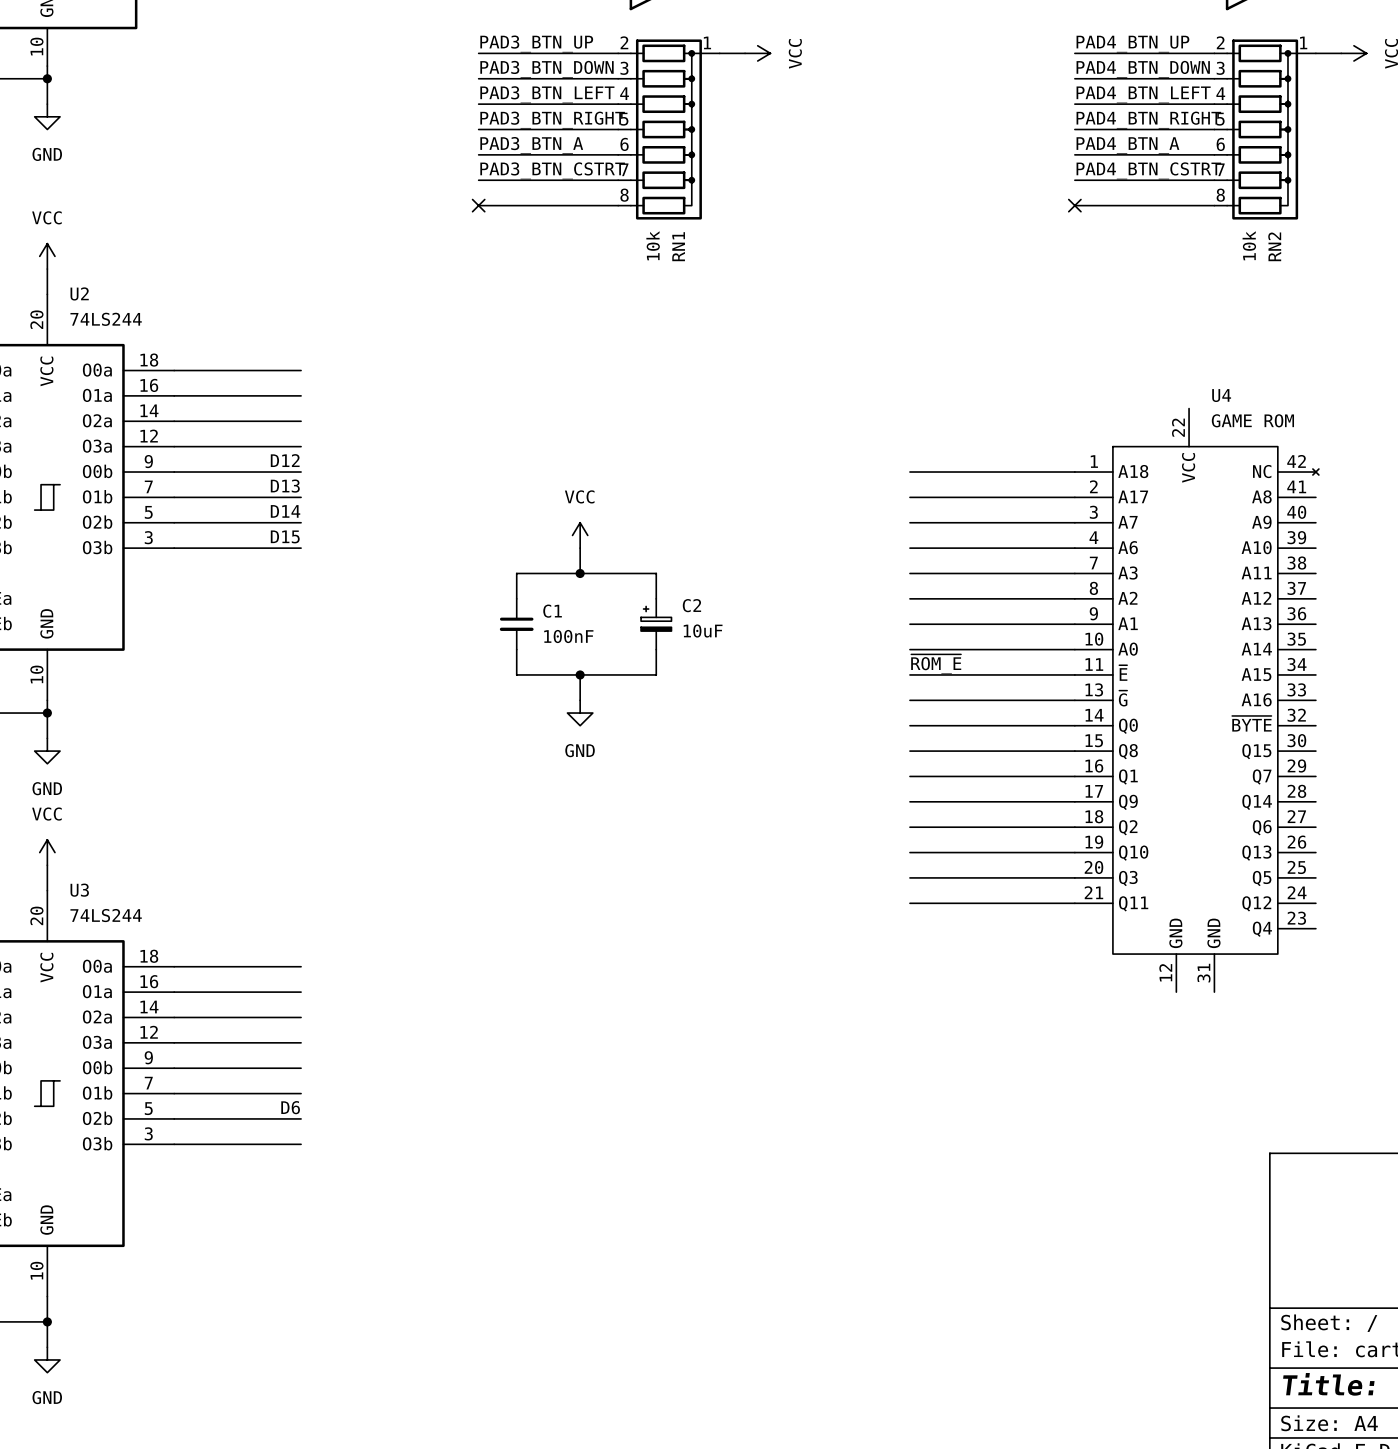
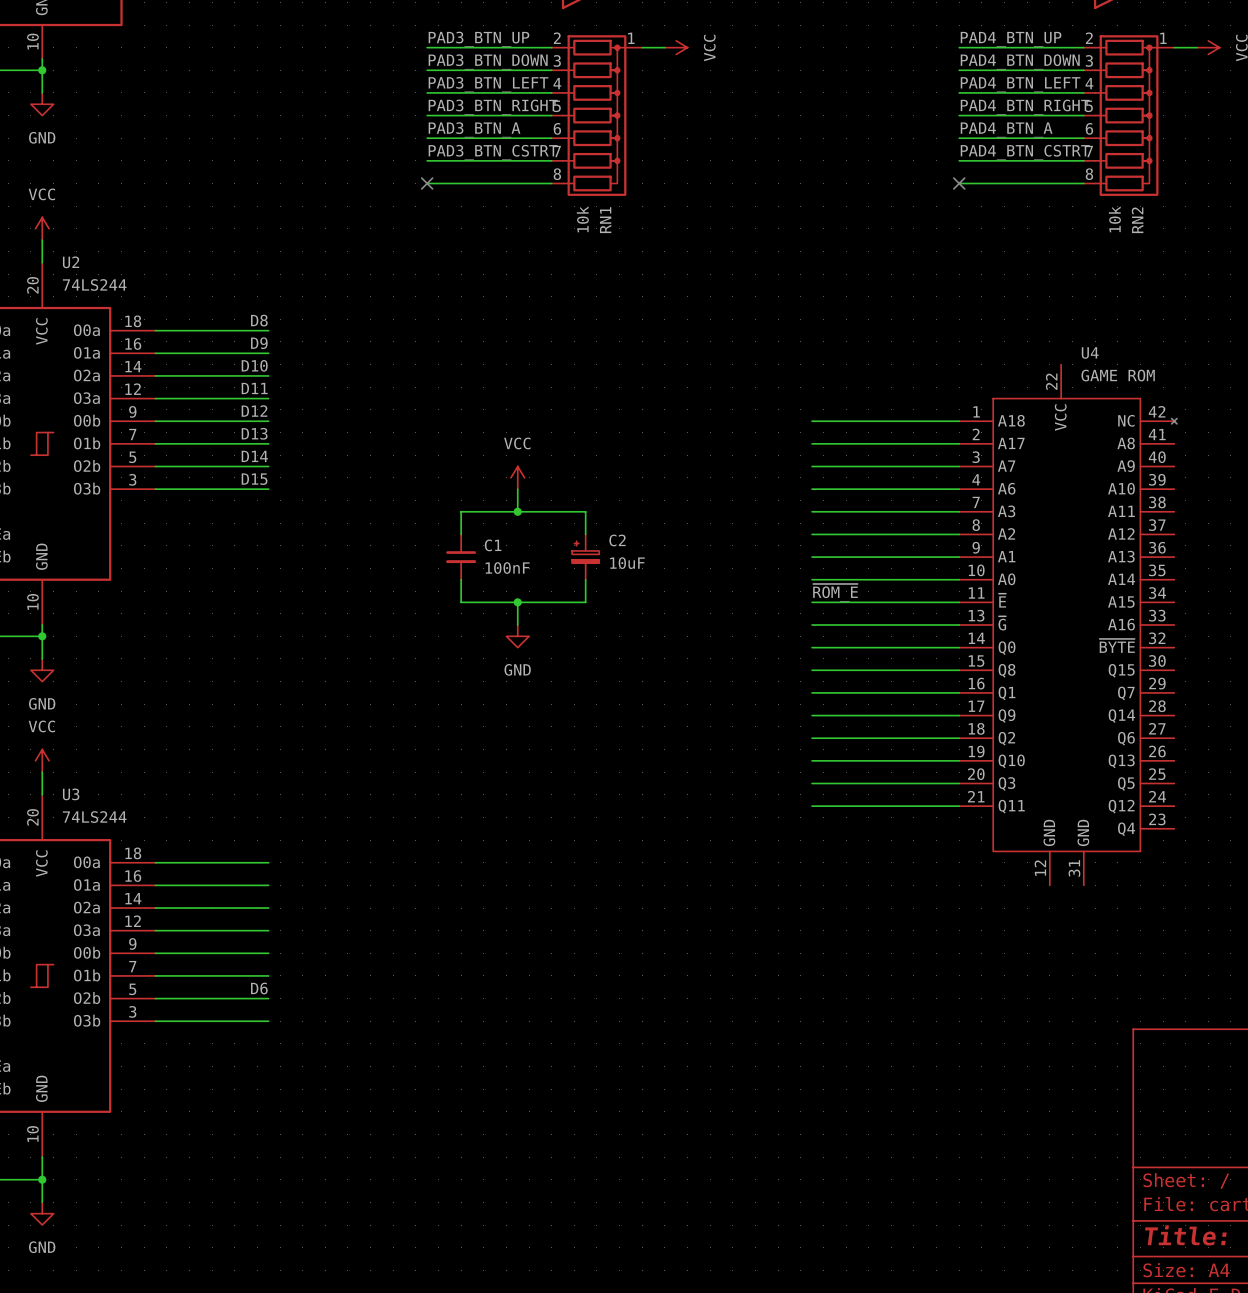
label: none -> D8 (259, 320)
label: none -> D9 (259, 343)
label: none -> D10 (254, 365)
label: none -> D11 (254, 388)

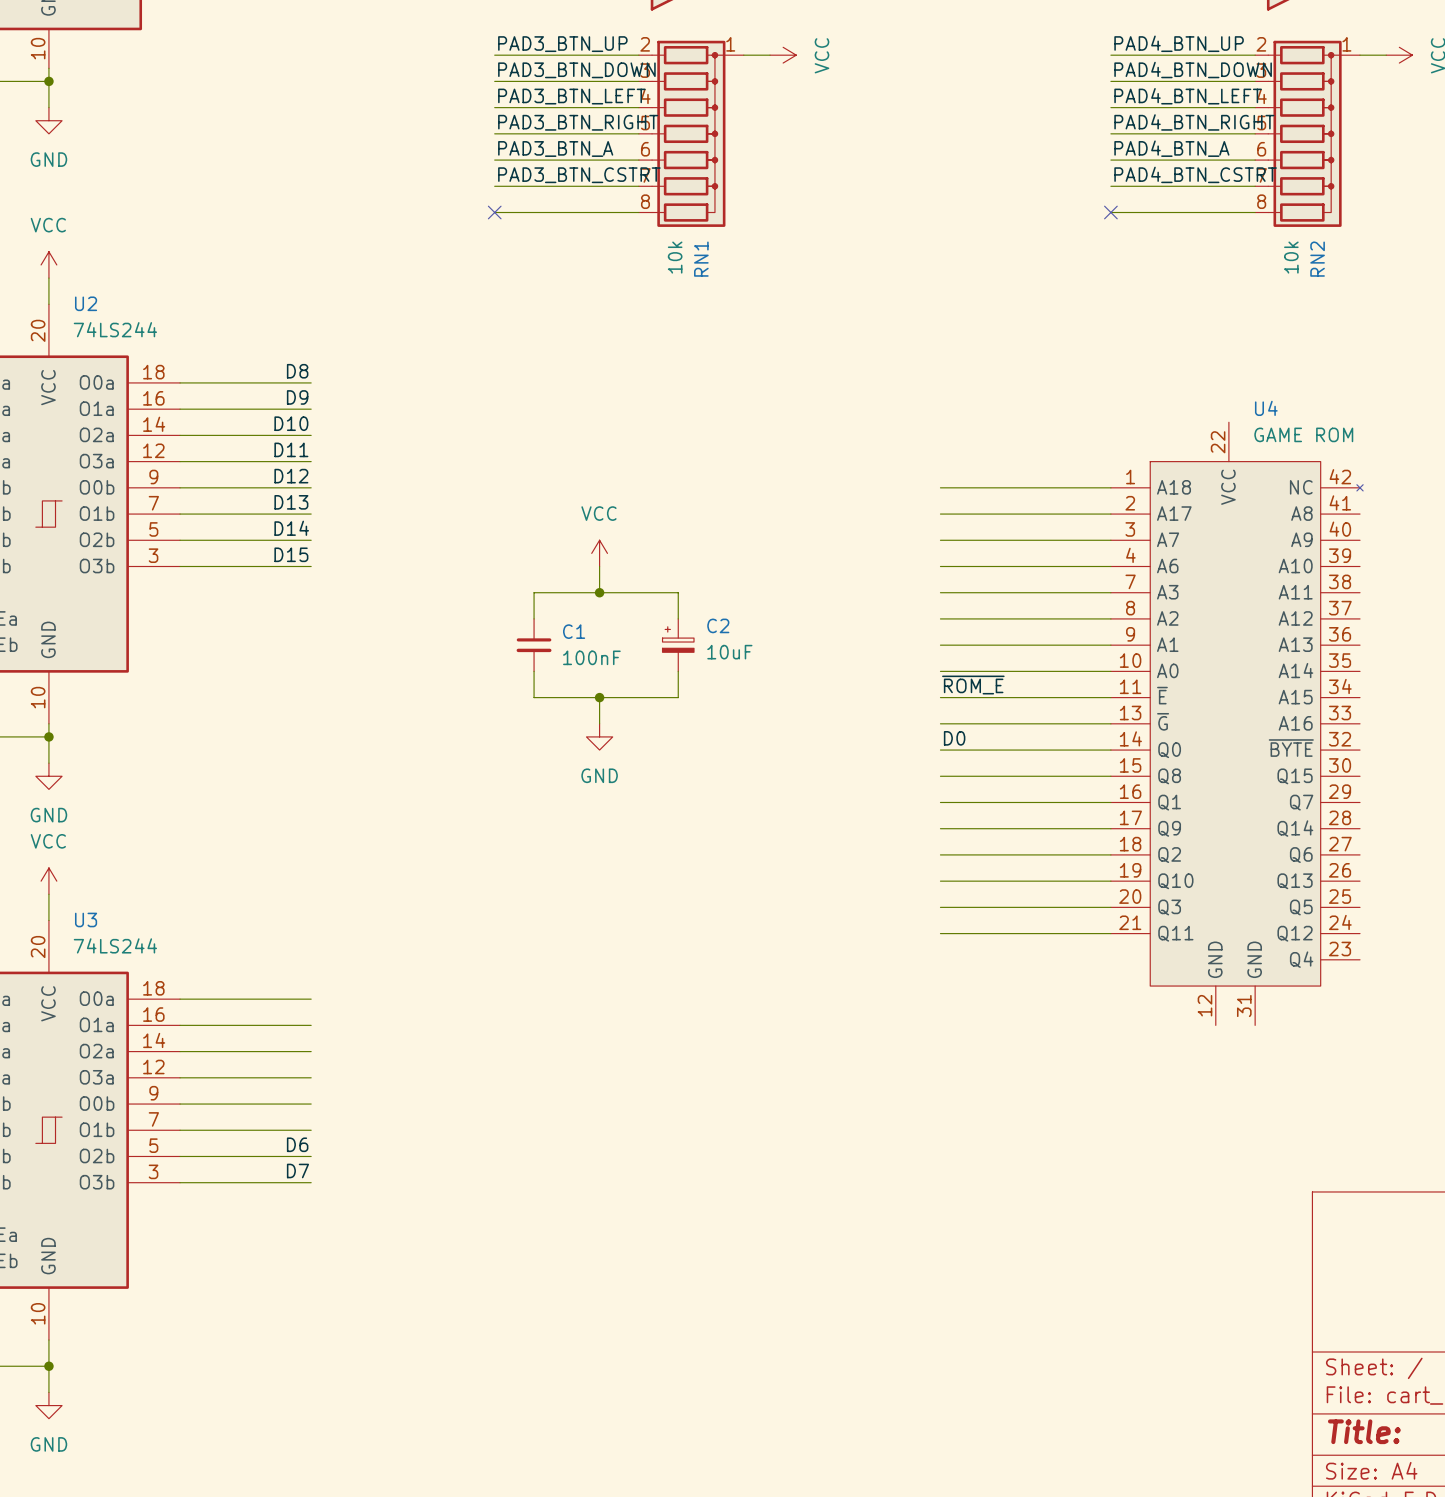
label: none -> D0 (954, 738)
label: none -> D7 (297, 1170)

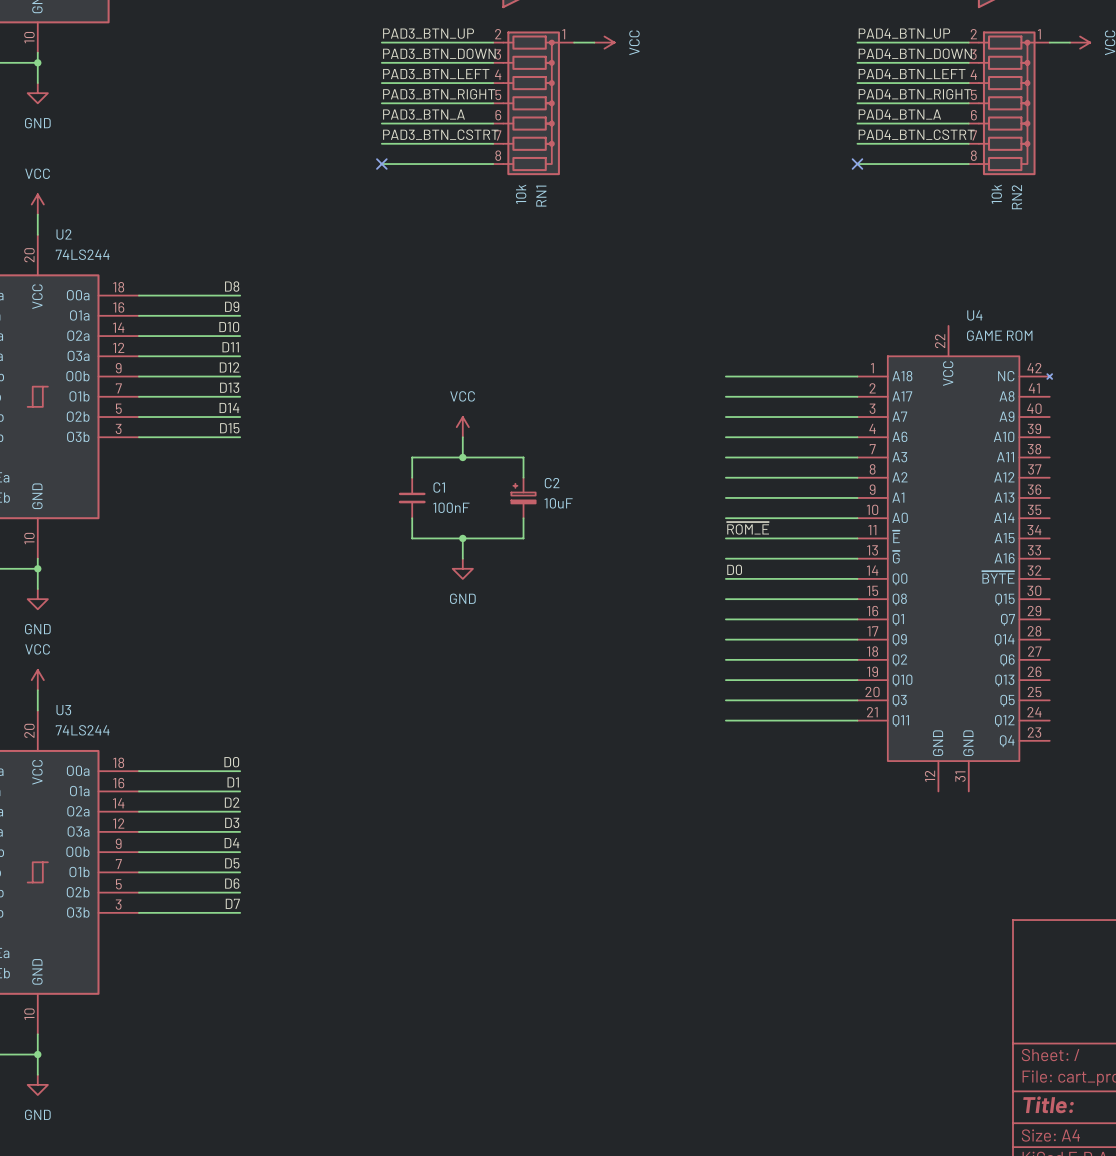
label: none -> D0 (231, 762)
label: none -> D1 (233, 782)
label: none -> D2 (232, 802)
label: none -> D3 (232, 822)
label: none -> D4 (231, 843)
label: none -> D5 (232, 863)

